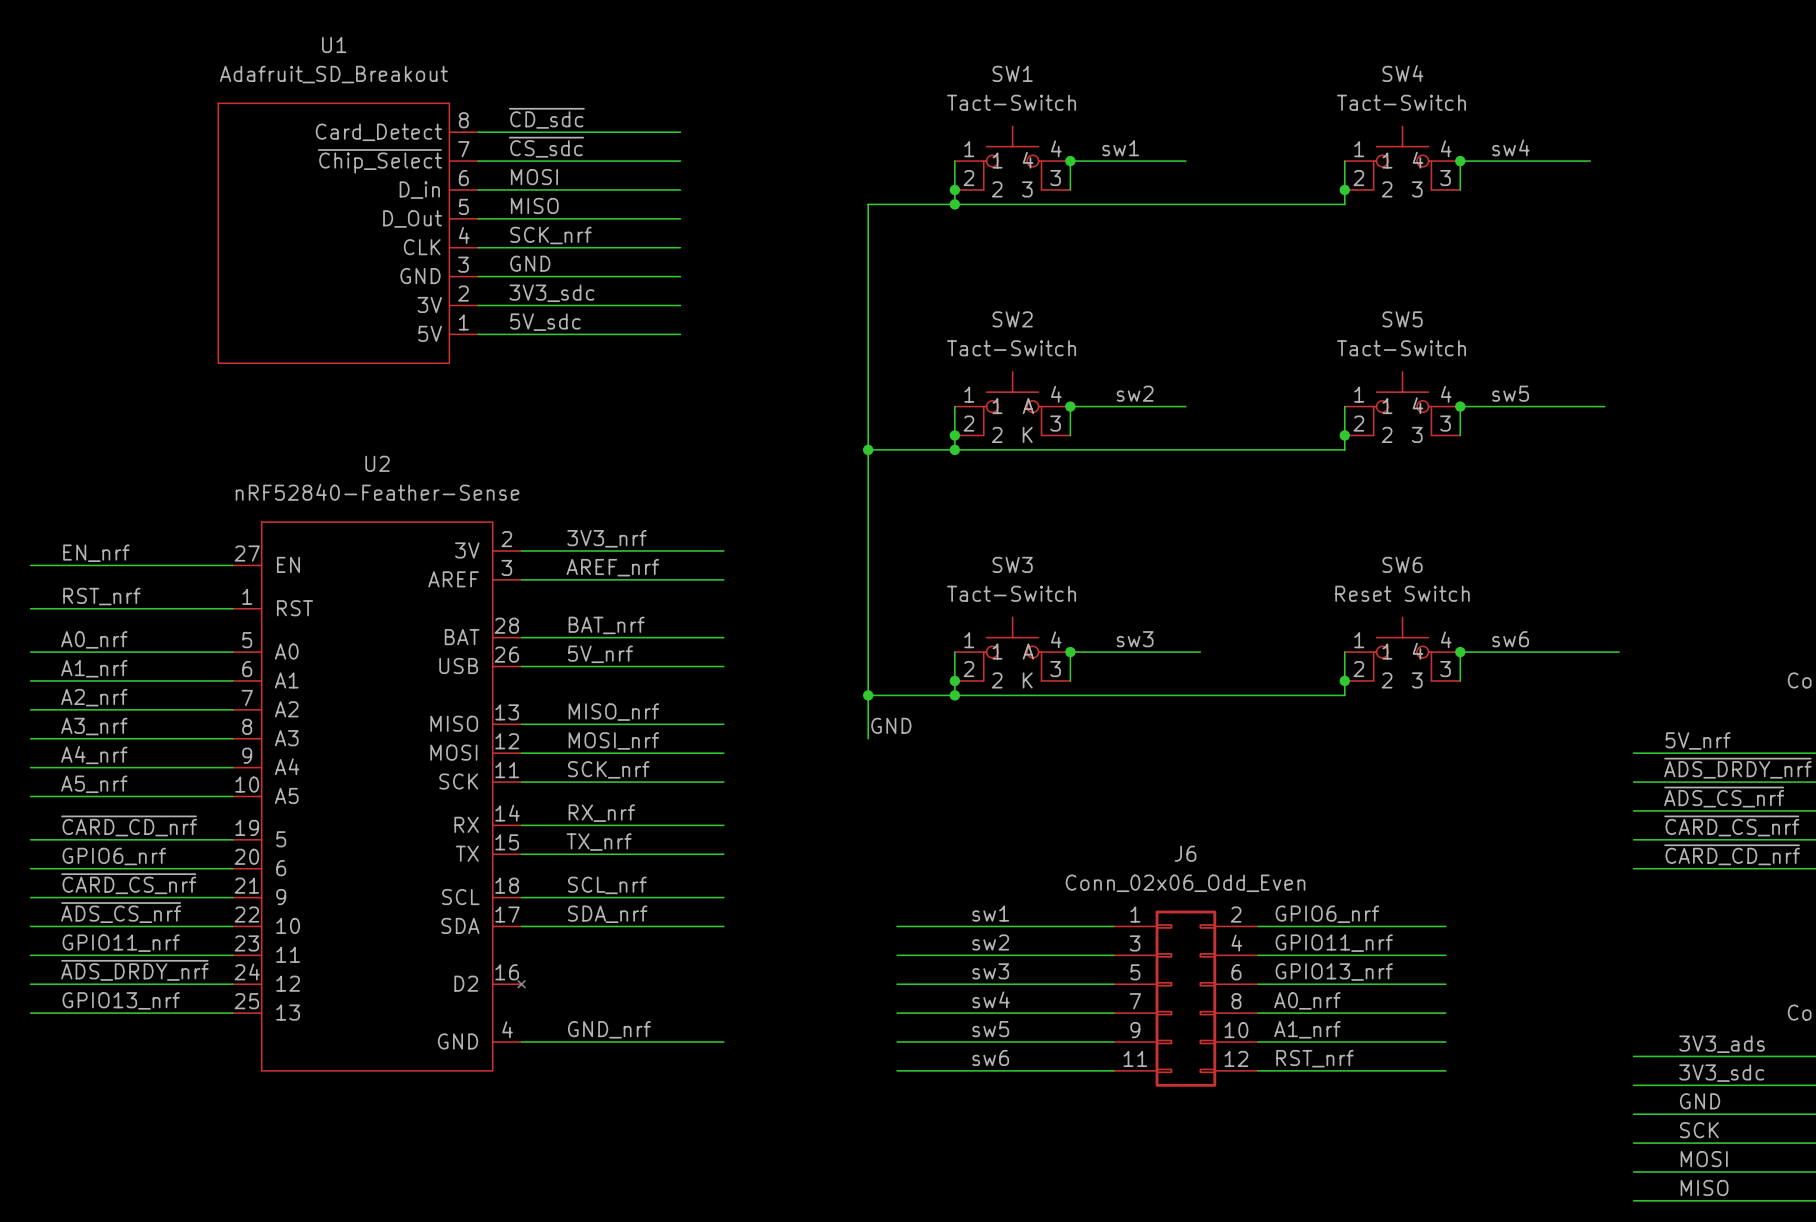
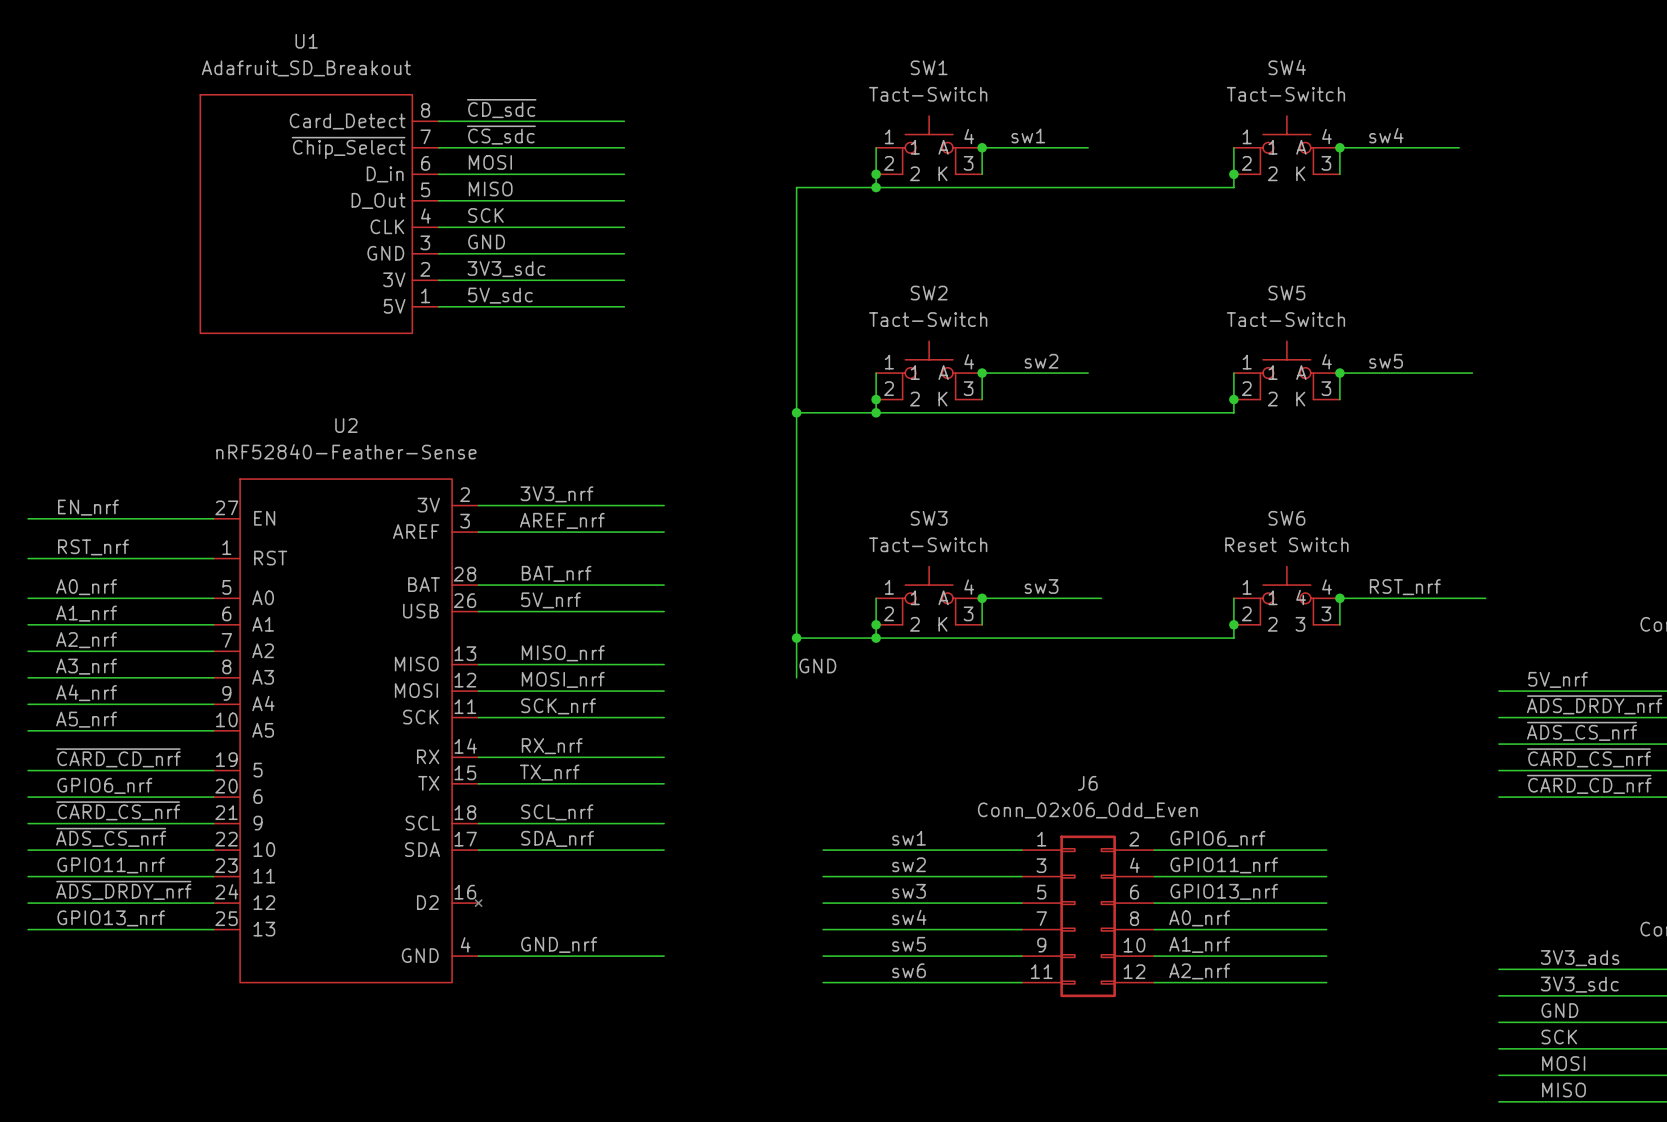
SW1 pin name: 4 (1028, 160) -> A (943, 147)
SW4 pin name: 4 (1417, 160) -> A (1301, 147)
SW1 pin name: 3 (1027, 189) -> K (942, 173)
SW4 pin name: 3 (1417, 189) -> K (1300, 173)
label: SCK_nrf (550, 235) -> SCK (485, 215)
SW5 pin name: 4 (1417, 405) -> A (1301, 372)
SW5 pin name: 3 (1417, 434) -> K (1300, 399)
label: sw6 (1510, 639) -> RST_nrf (1405, 587)
label: RST_nrf (1314, 1058) -> A2_nrf (1199, 971)

